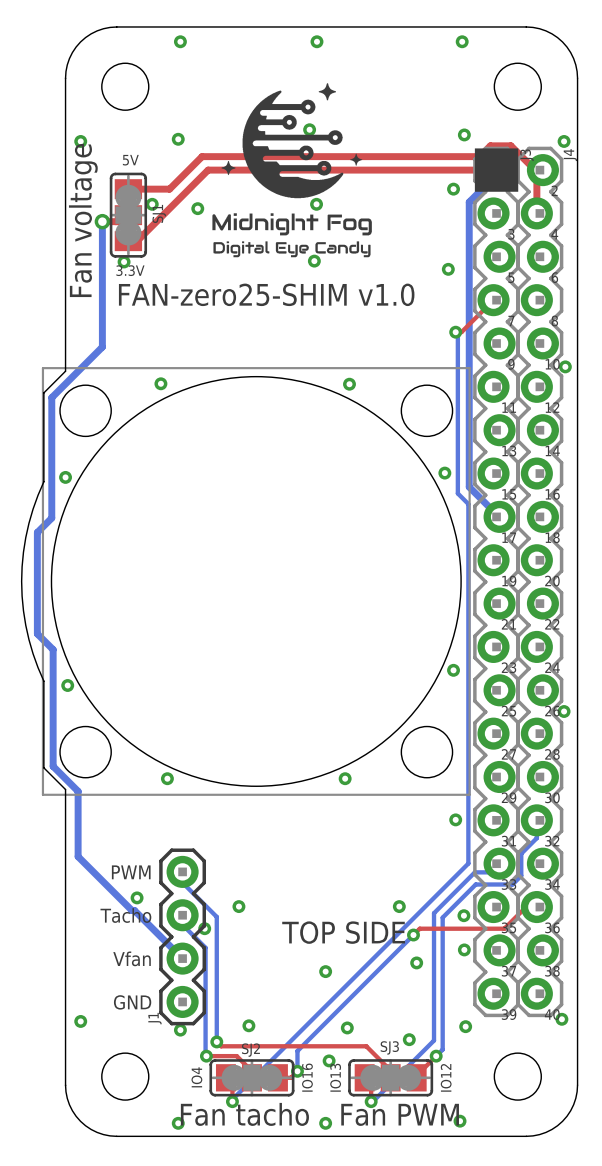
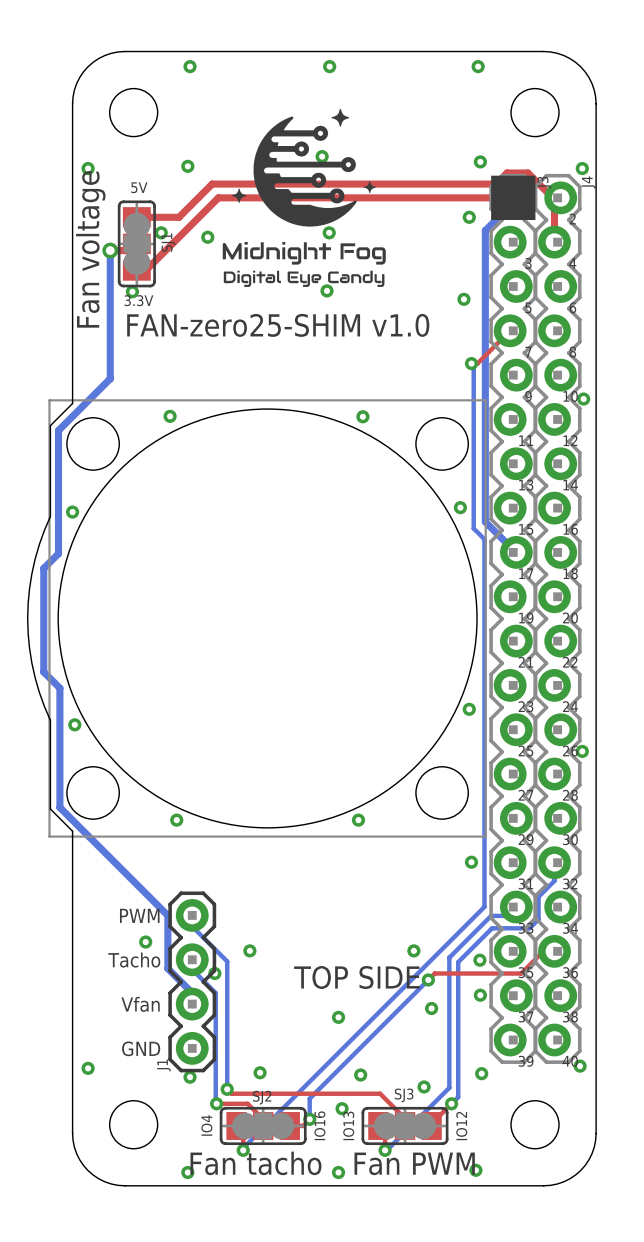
bottom track: (78, 791) (78, 856) (182, 958) -> (85, 833) (167, 915) (167, 968) (192, 992) (192, 1004)

